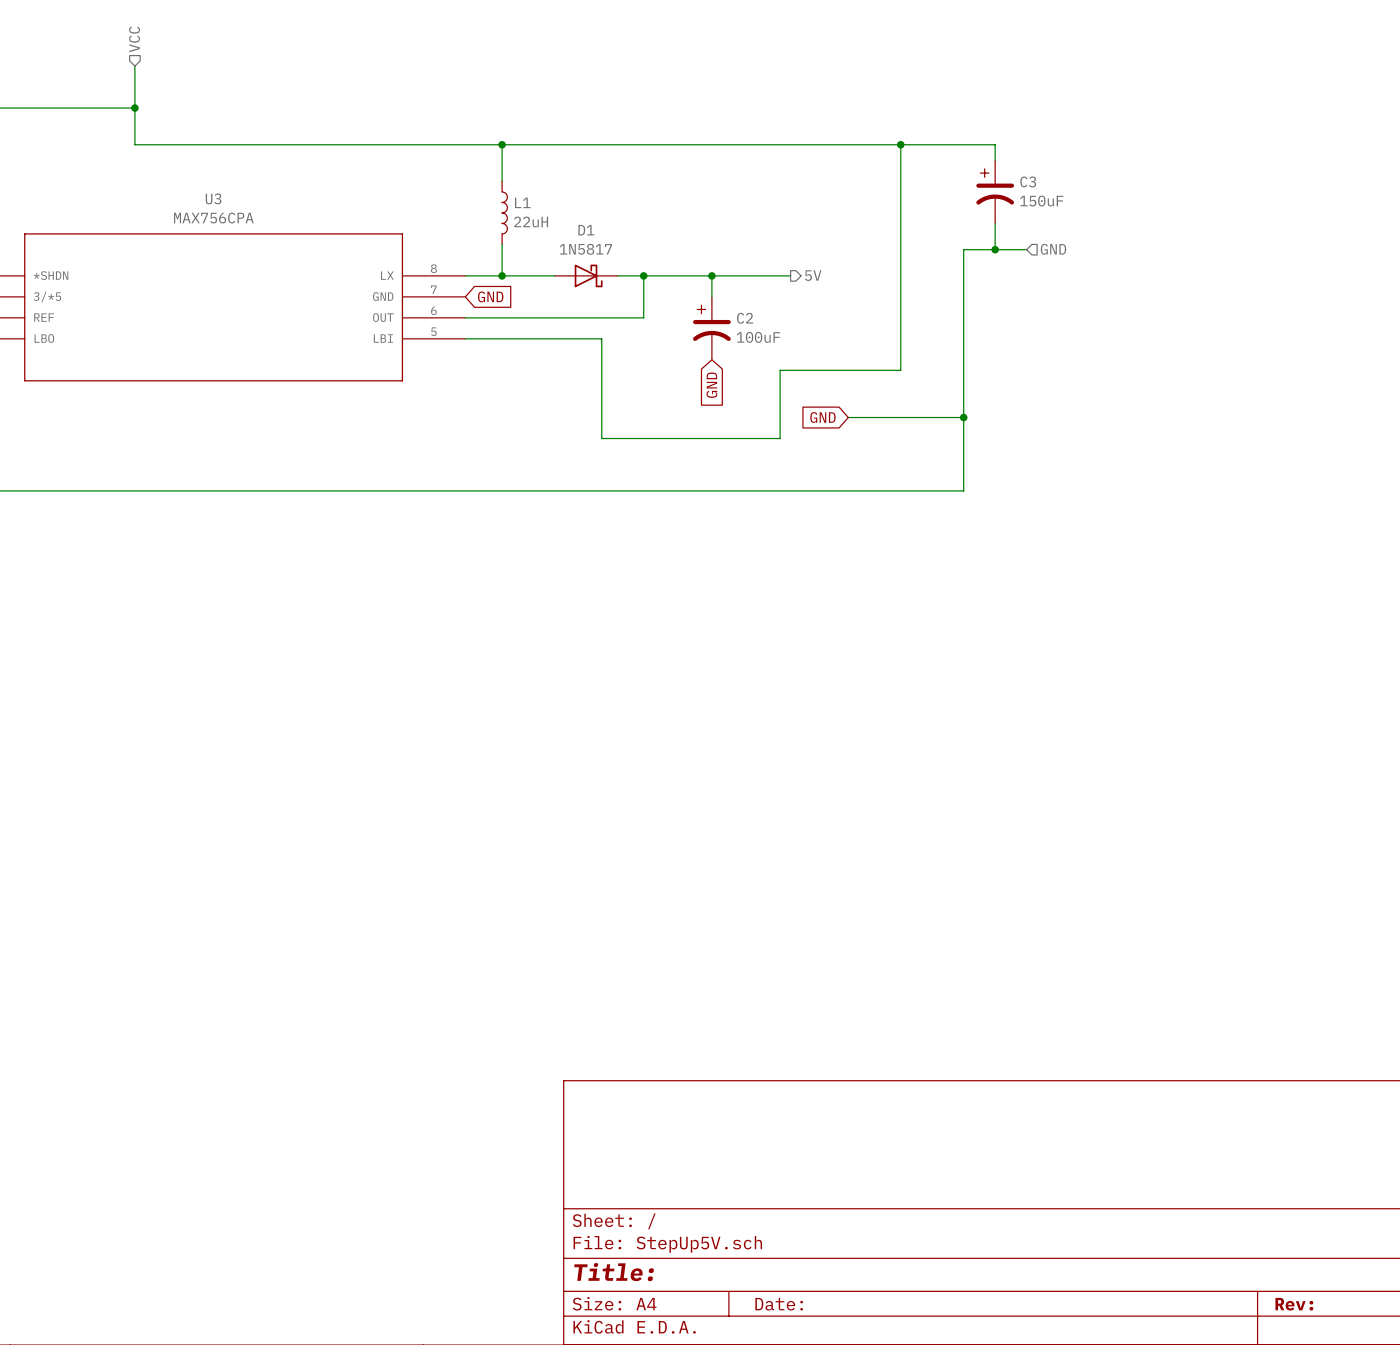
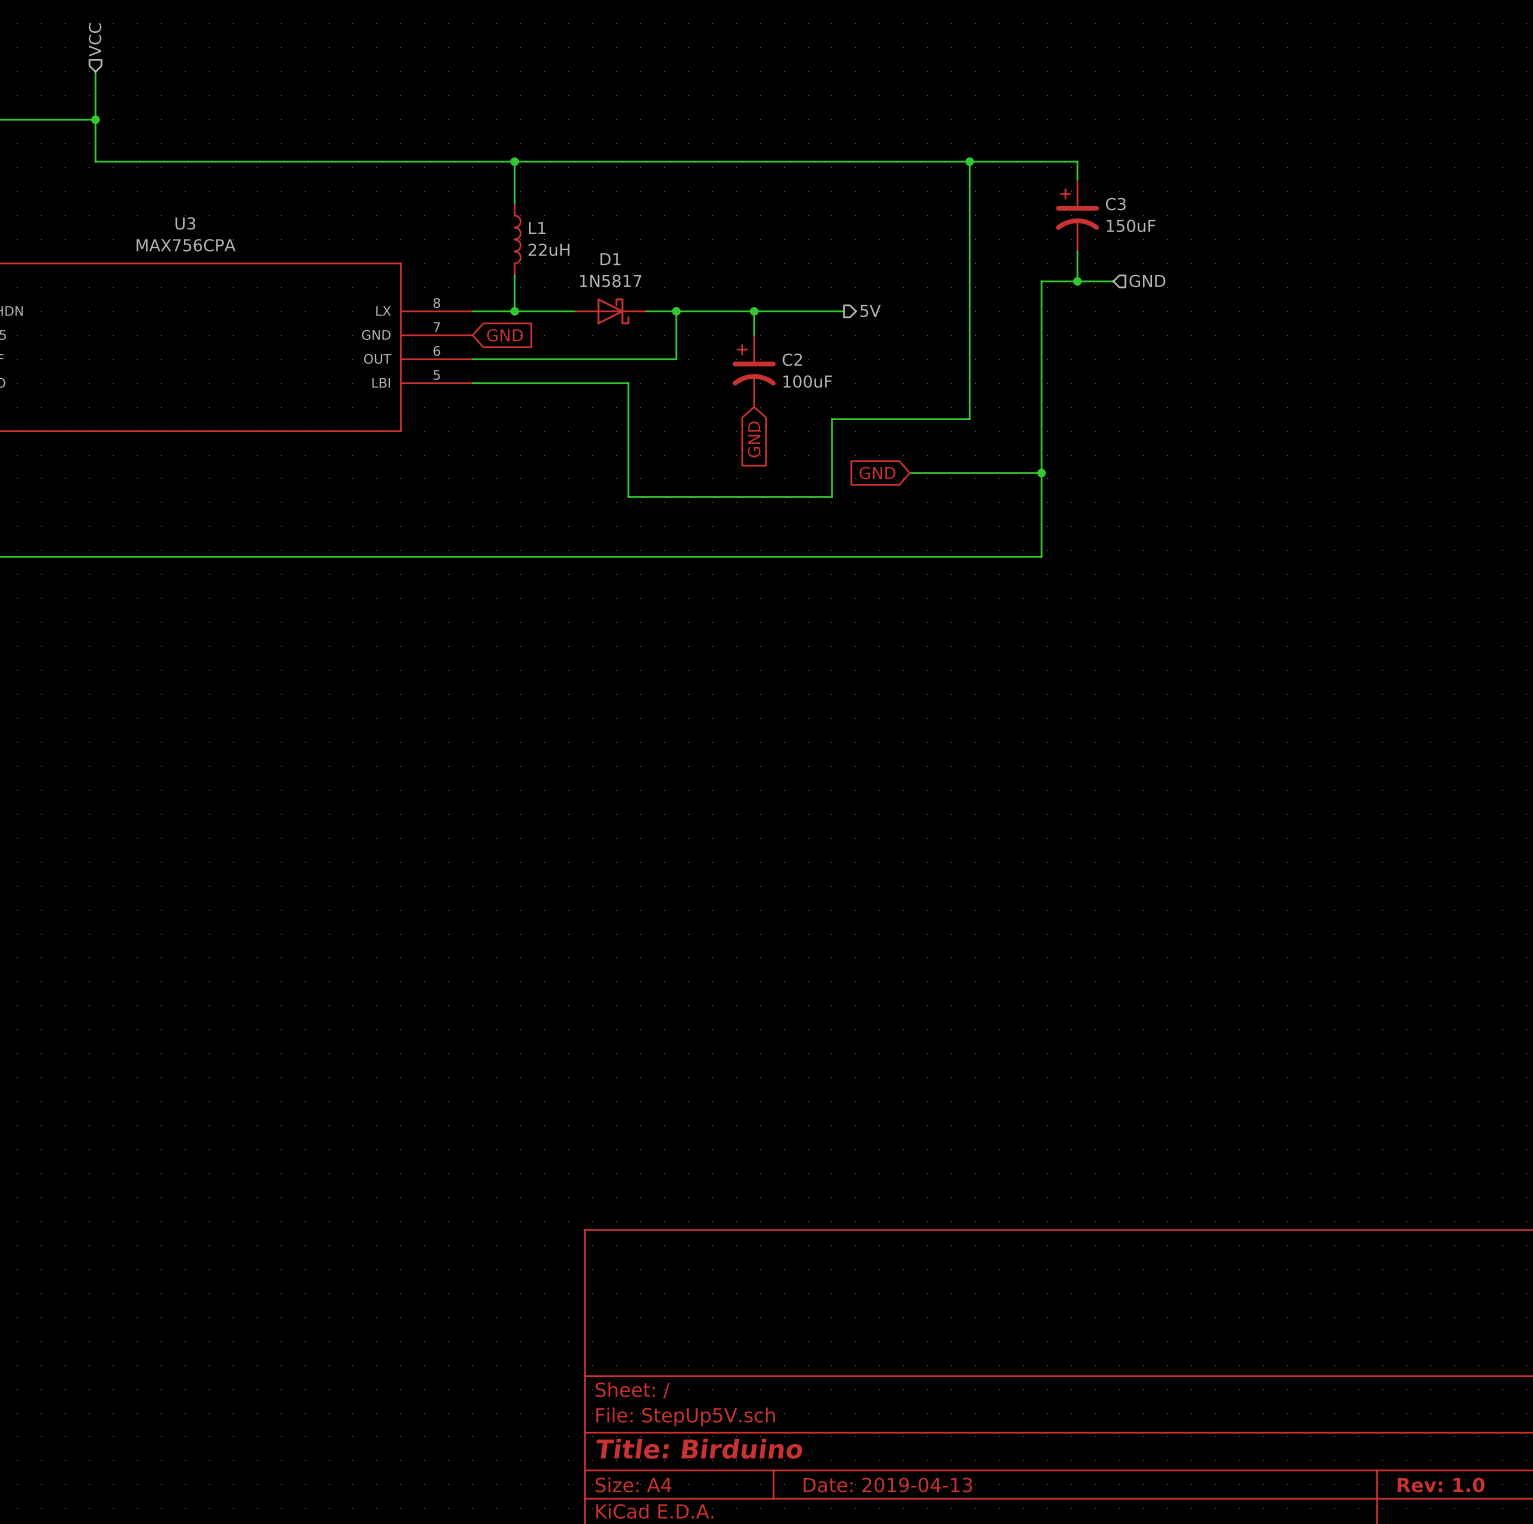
title block: Title: (614, 1272) -> Title: Birduino (699, 1448)
title block: Date: (779, 1304) -> Date: 2019-04-13 (887, 1485)
title block: Rev: (1294, 1304) -> Rev: 1.0 (1441, 1485)

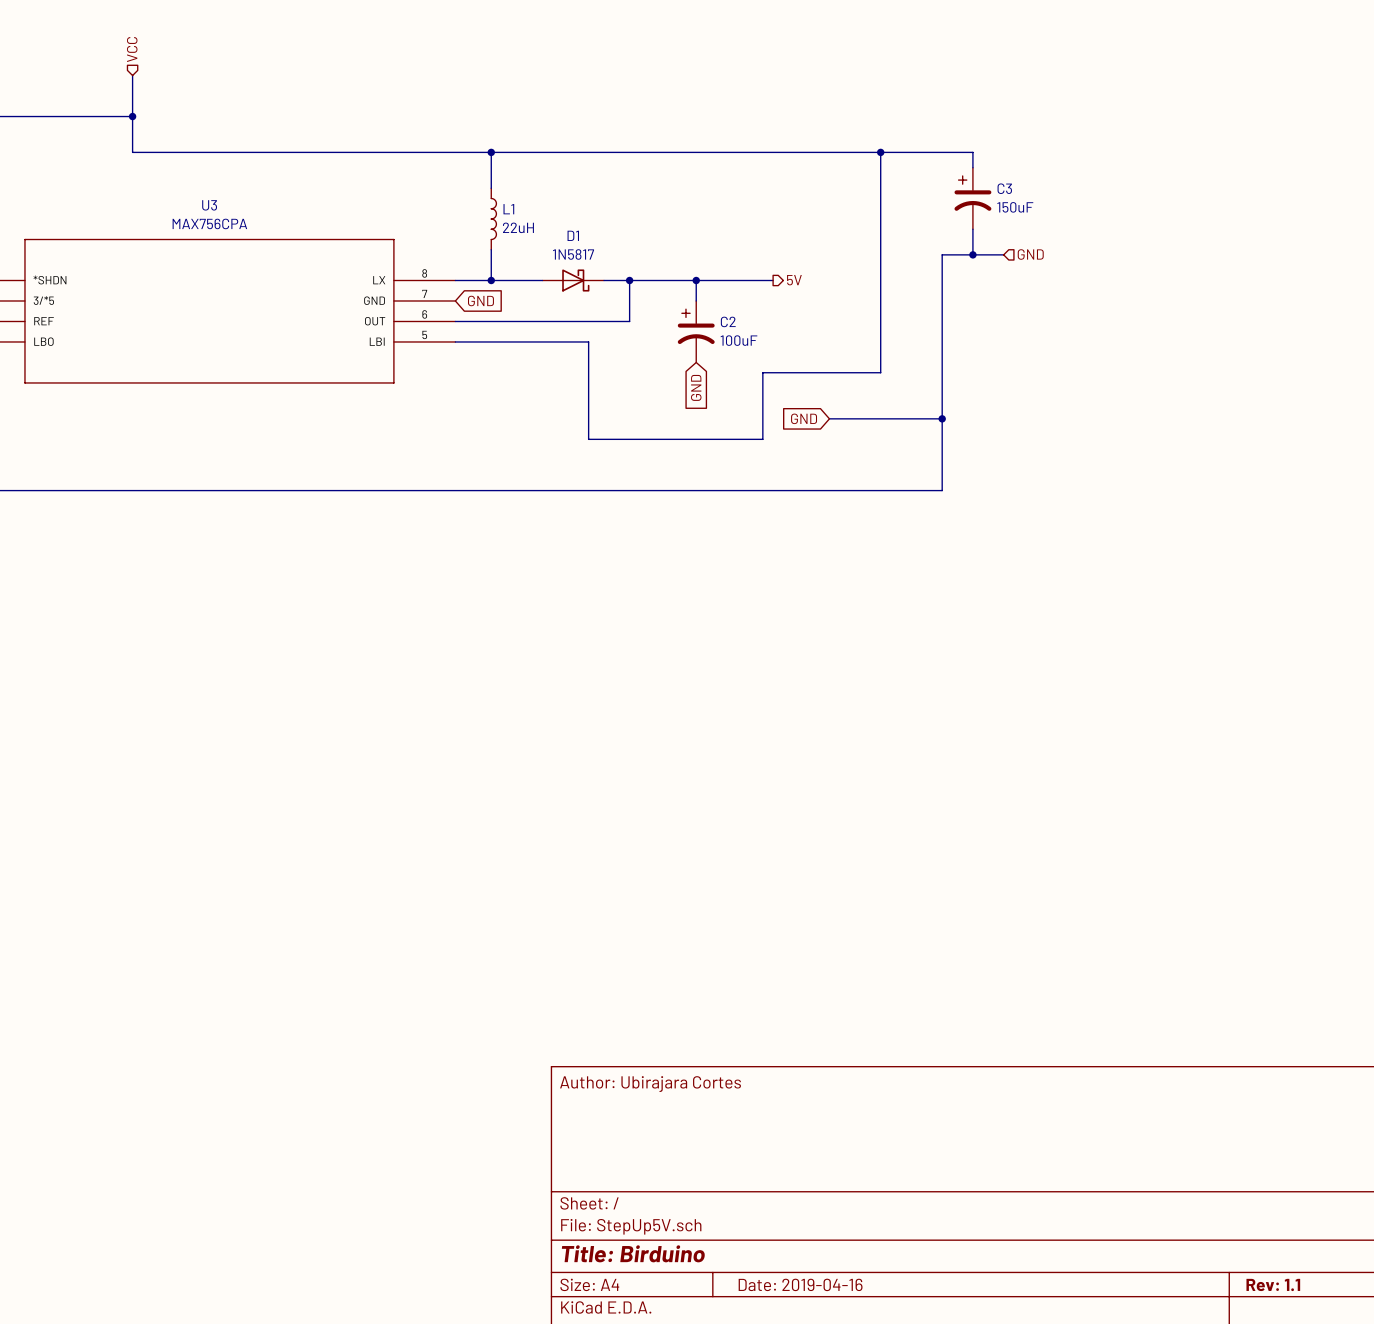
title block: none -> Author: Ubirajara Cortes (650, 1084)
title block: Date: 2019-04-13 (887, 1485) -> Date: 2019-04-16 (800, 1284)
title block: Rev: 1.0 (1441, 1485) -> Rev: 1.1 (1273, 1284)

